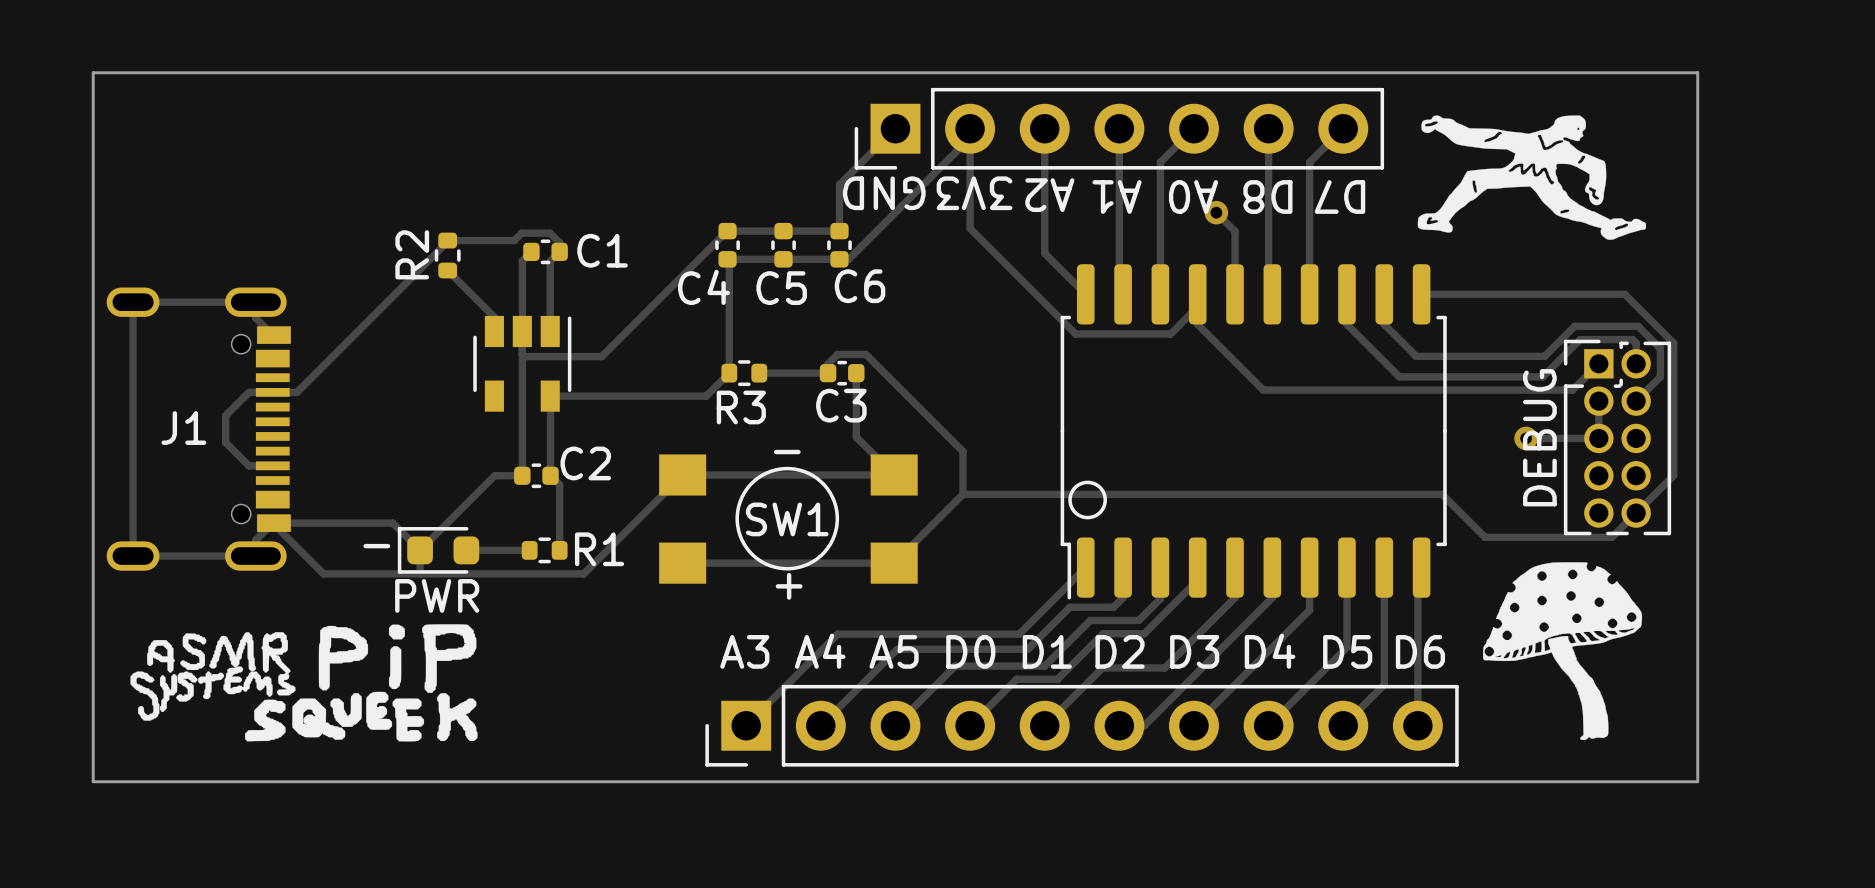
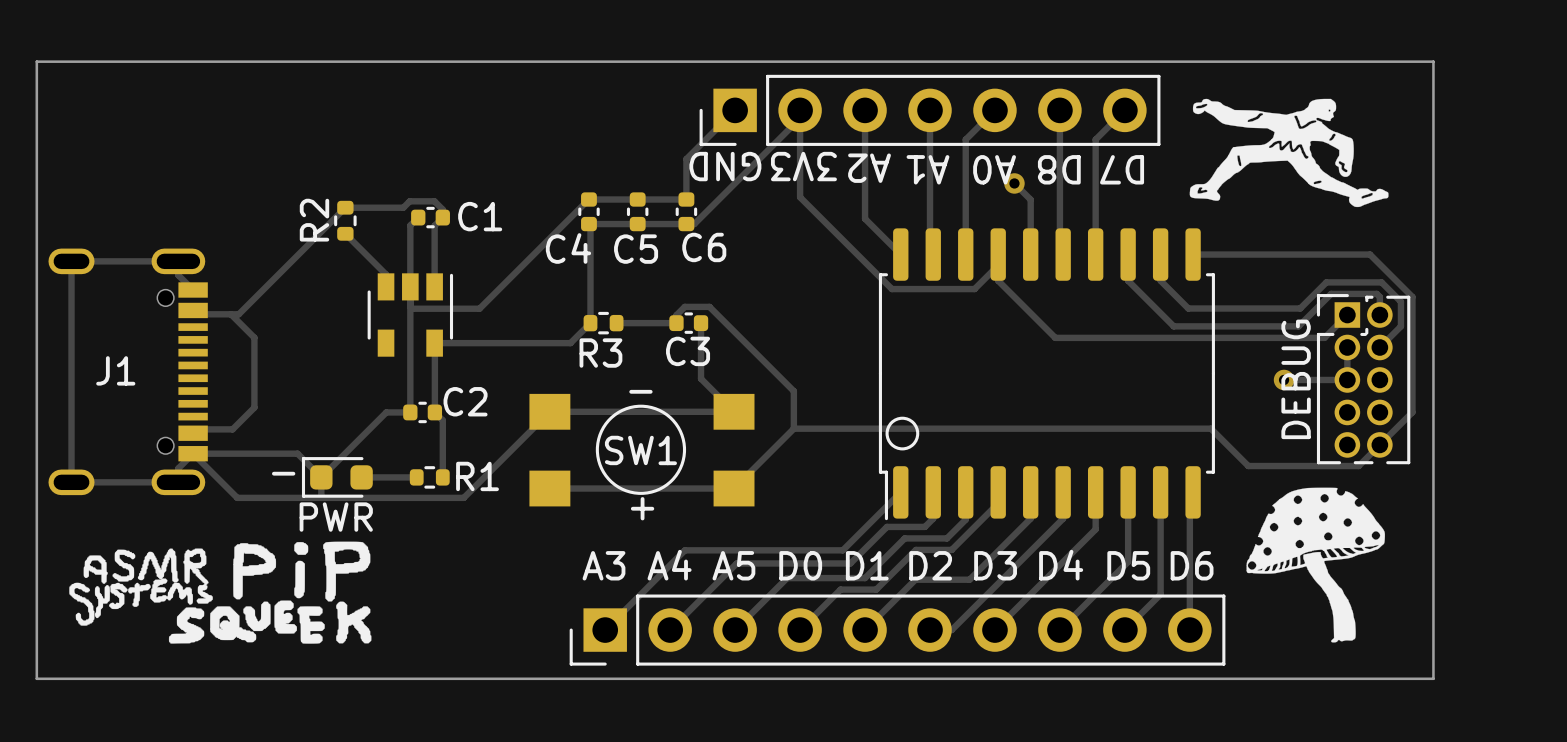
track: (447, 241) (297, 392) (248, 392) (225, 415) (225, 442) (248, 465) (272, 465) -> (345, 207) (238, 314) (193, 314) (193, 306)
J1 footprint: [106, 287, 291, 571] -> [48, 248, 208, 496]
track: none -> (230, 314) (254, 337) (254, 407) (232, 429) (193, 429) (193, 437)

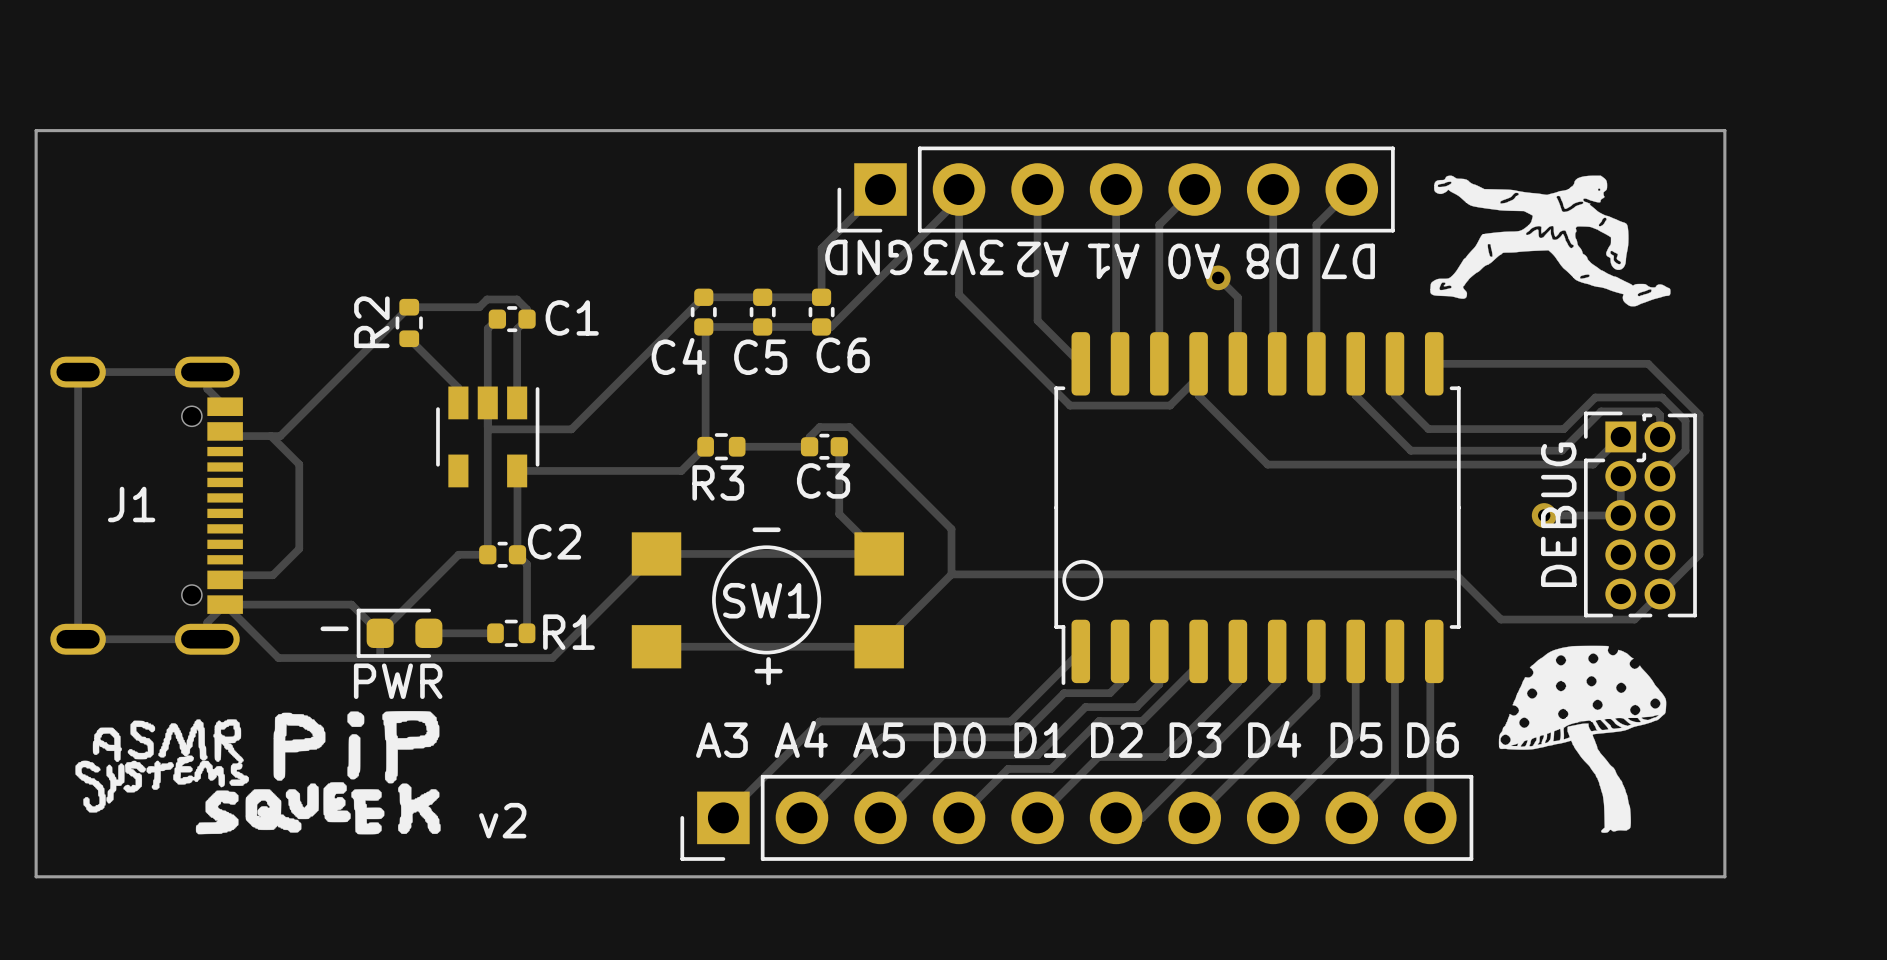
text: none -> v2 (502, 820)

